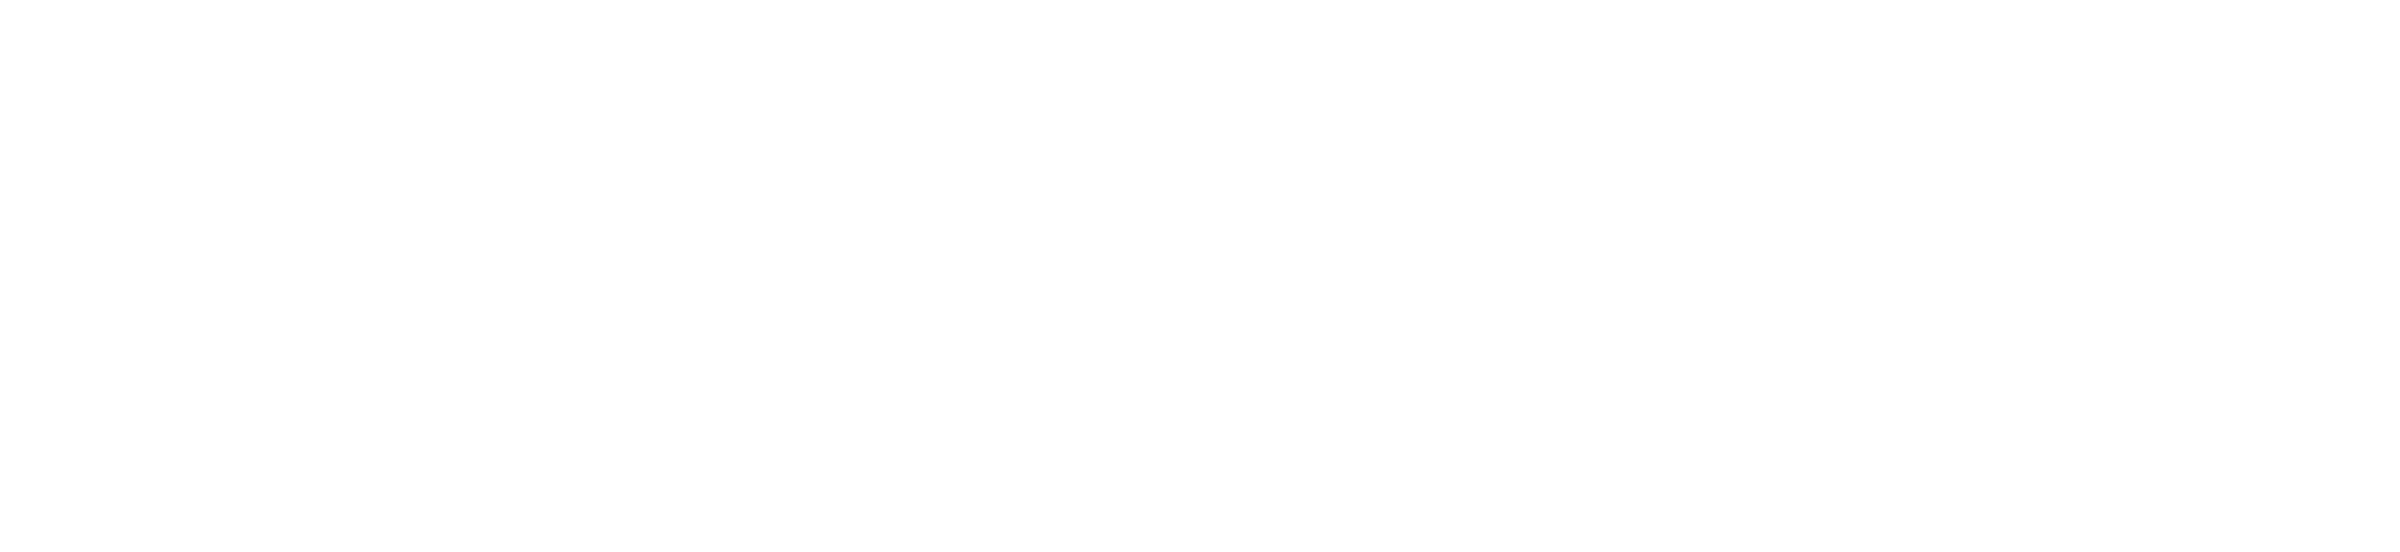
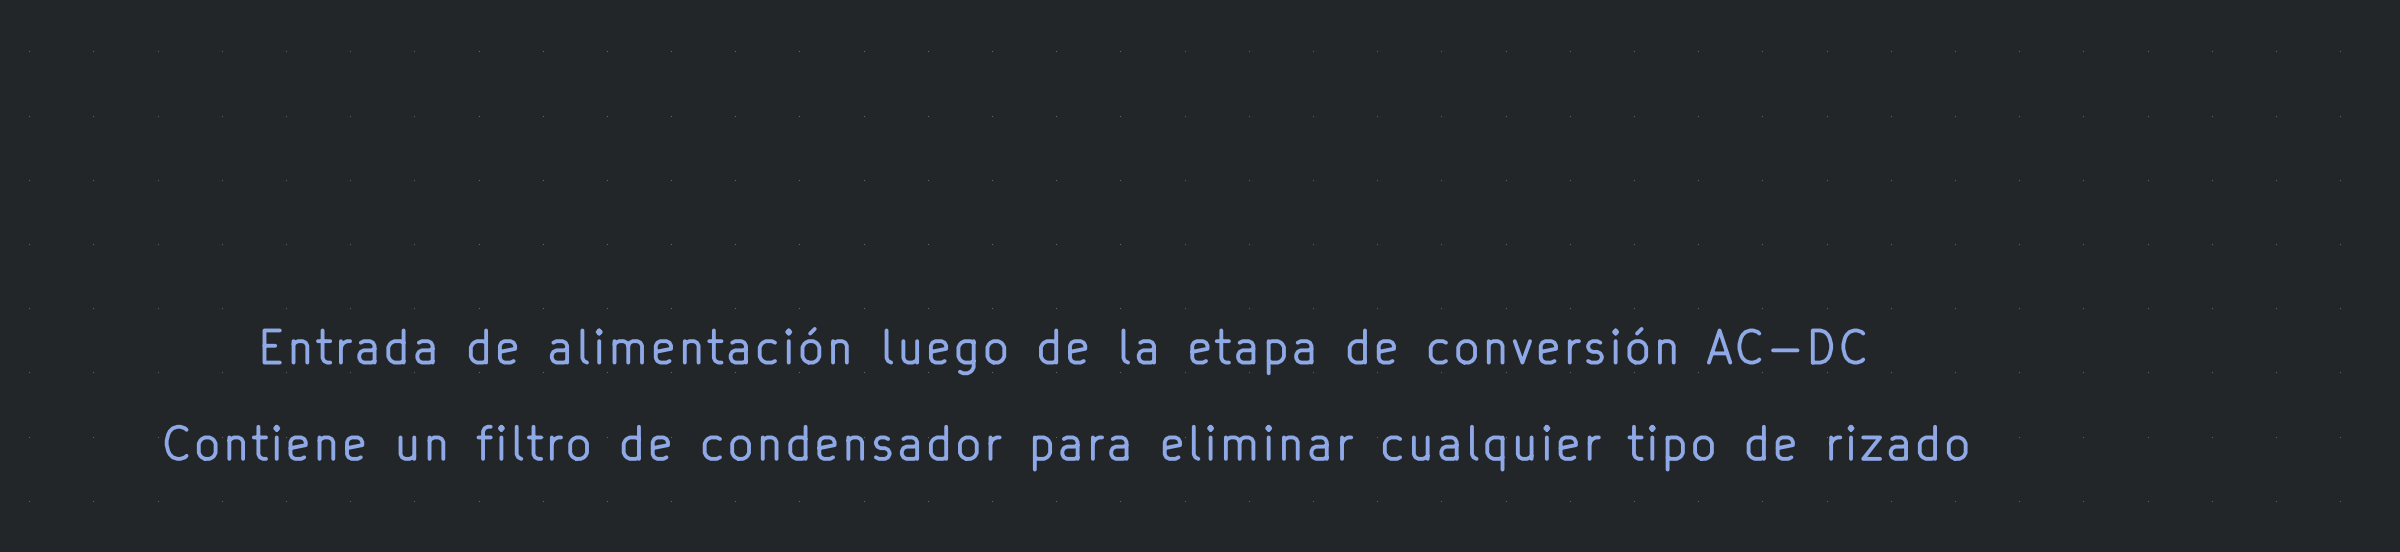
text: none -> Entrada de alimentación luego de la etapa de conversión AC-DC (1063, 351)
text: none -> Contiene un filtro de condensador para eliminar cualquier tipo de rizado (1066, 448)

